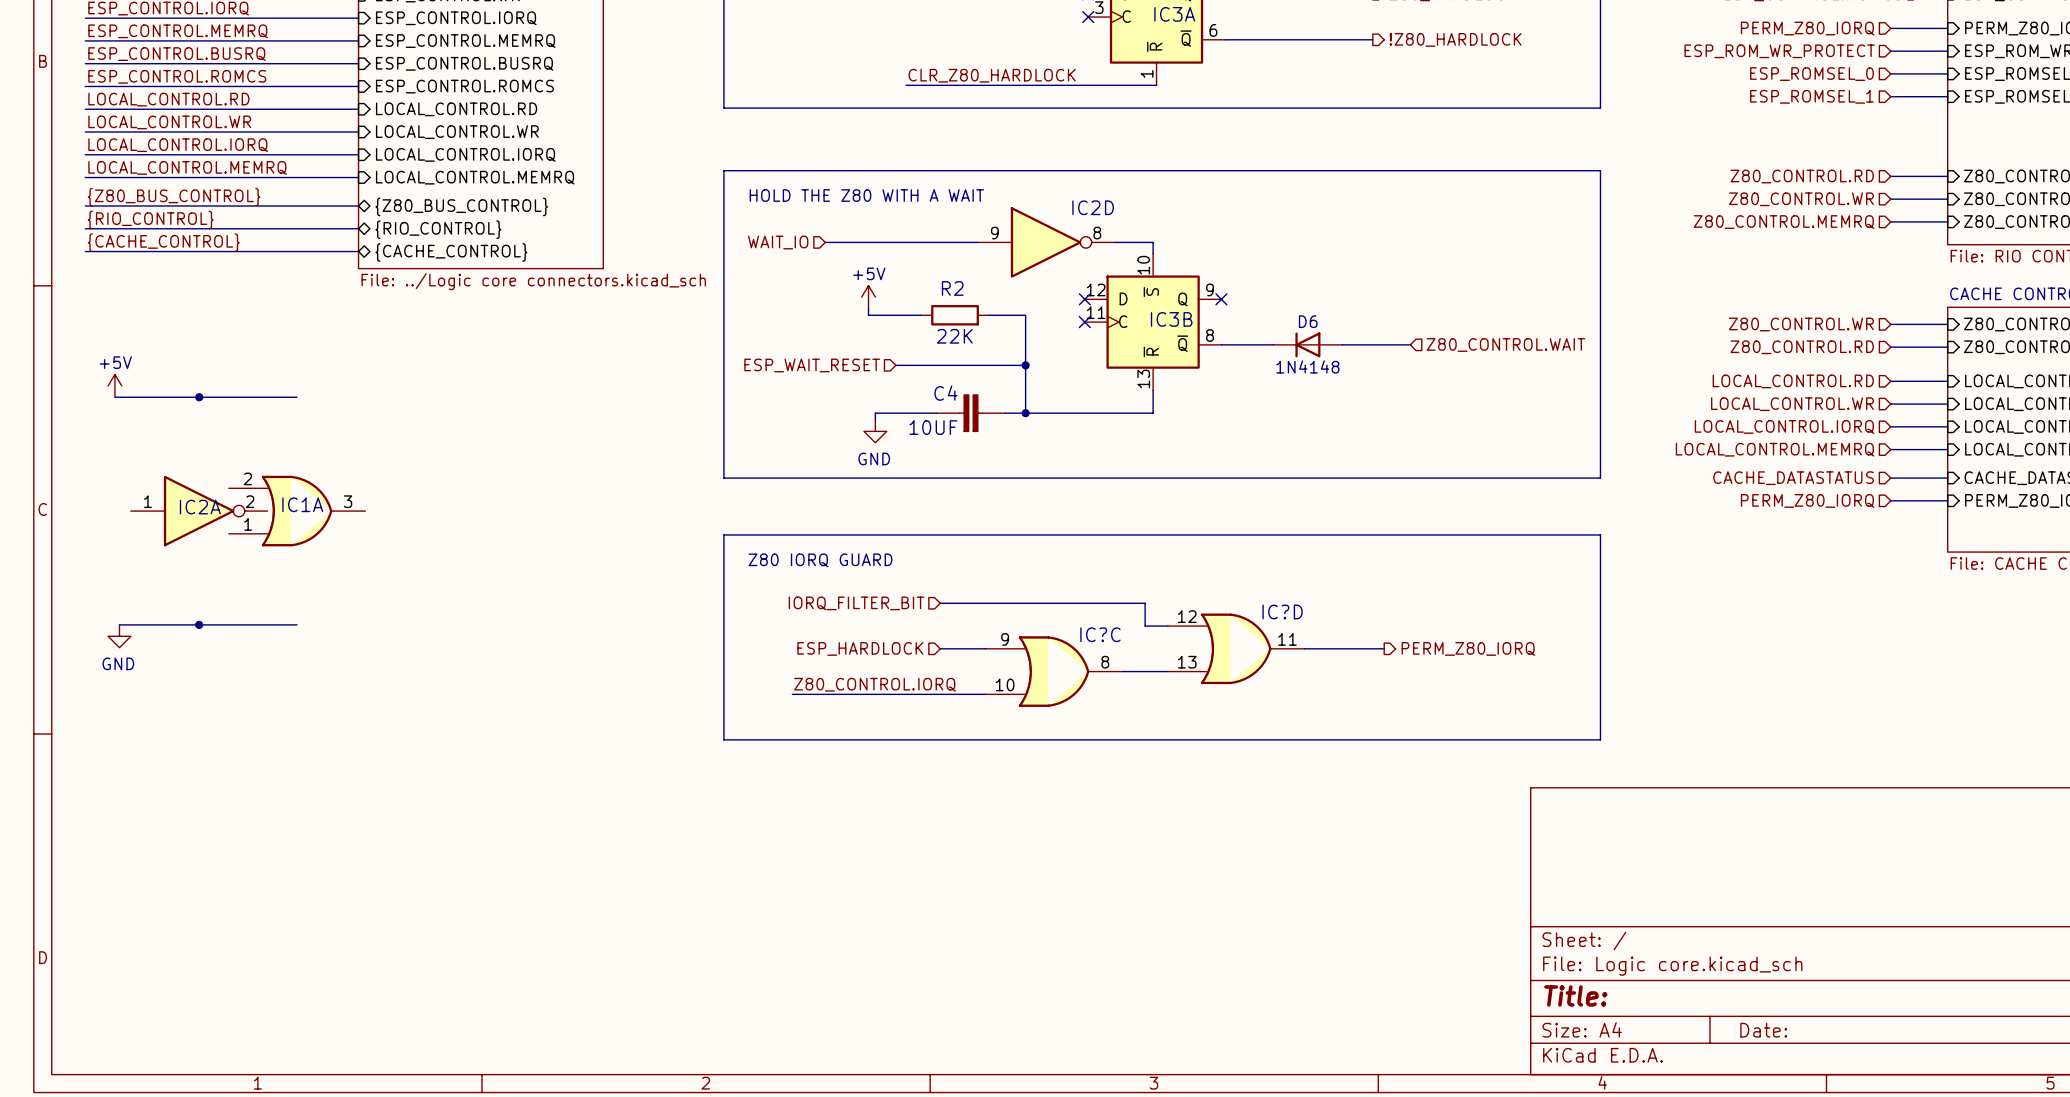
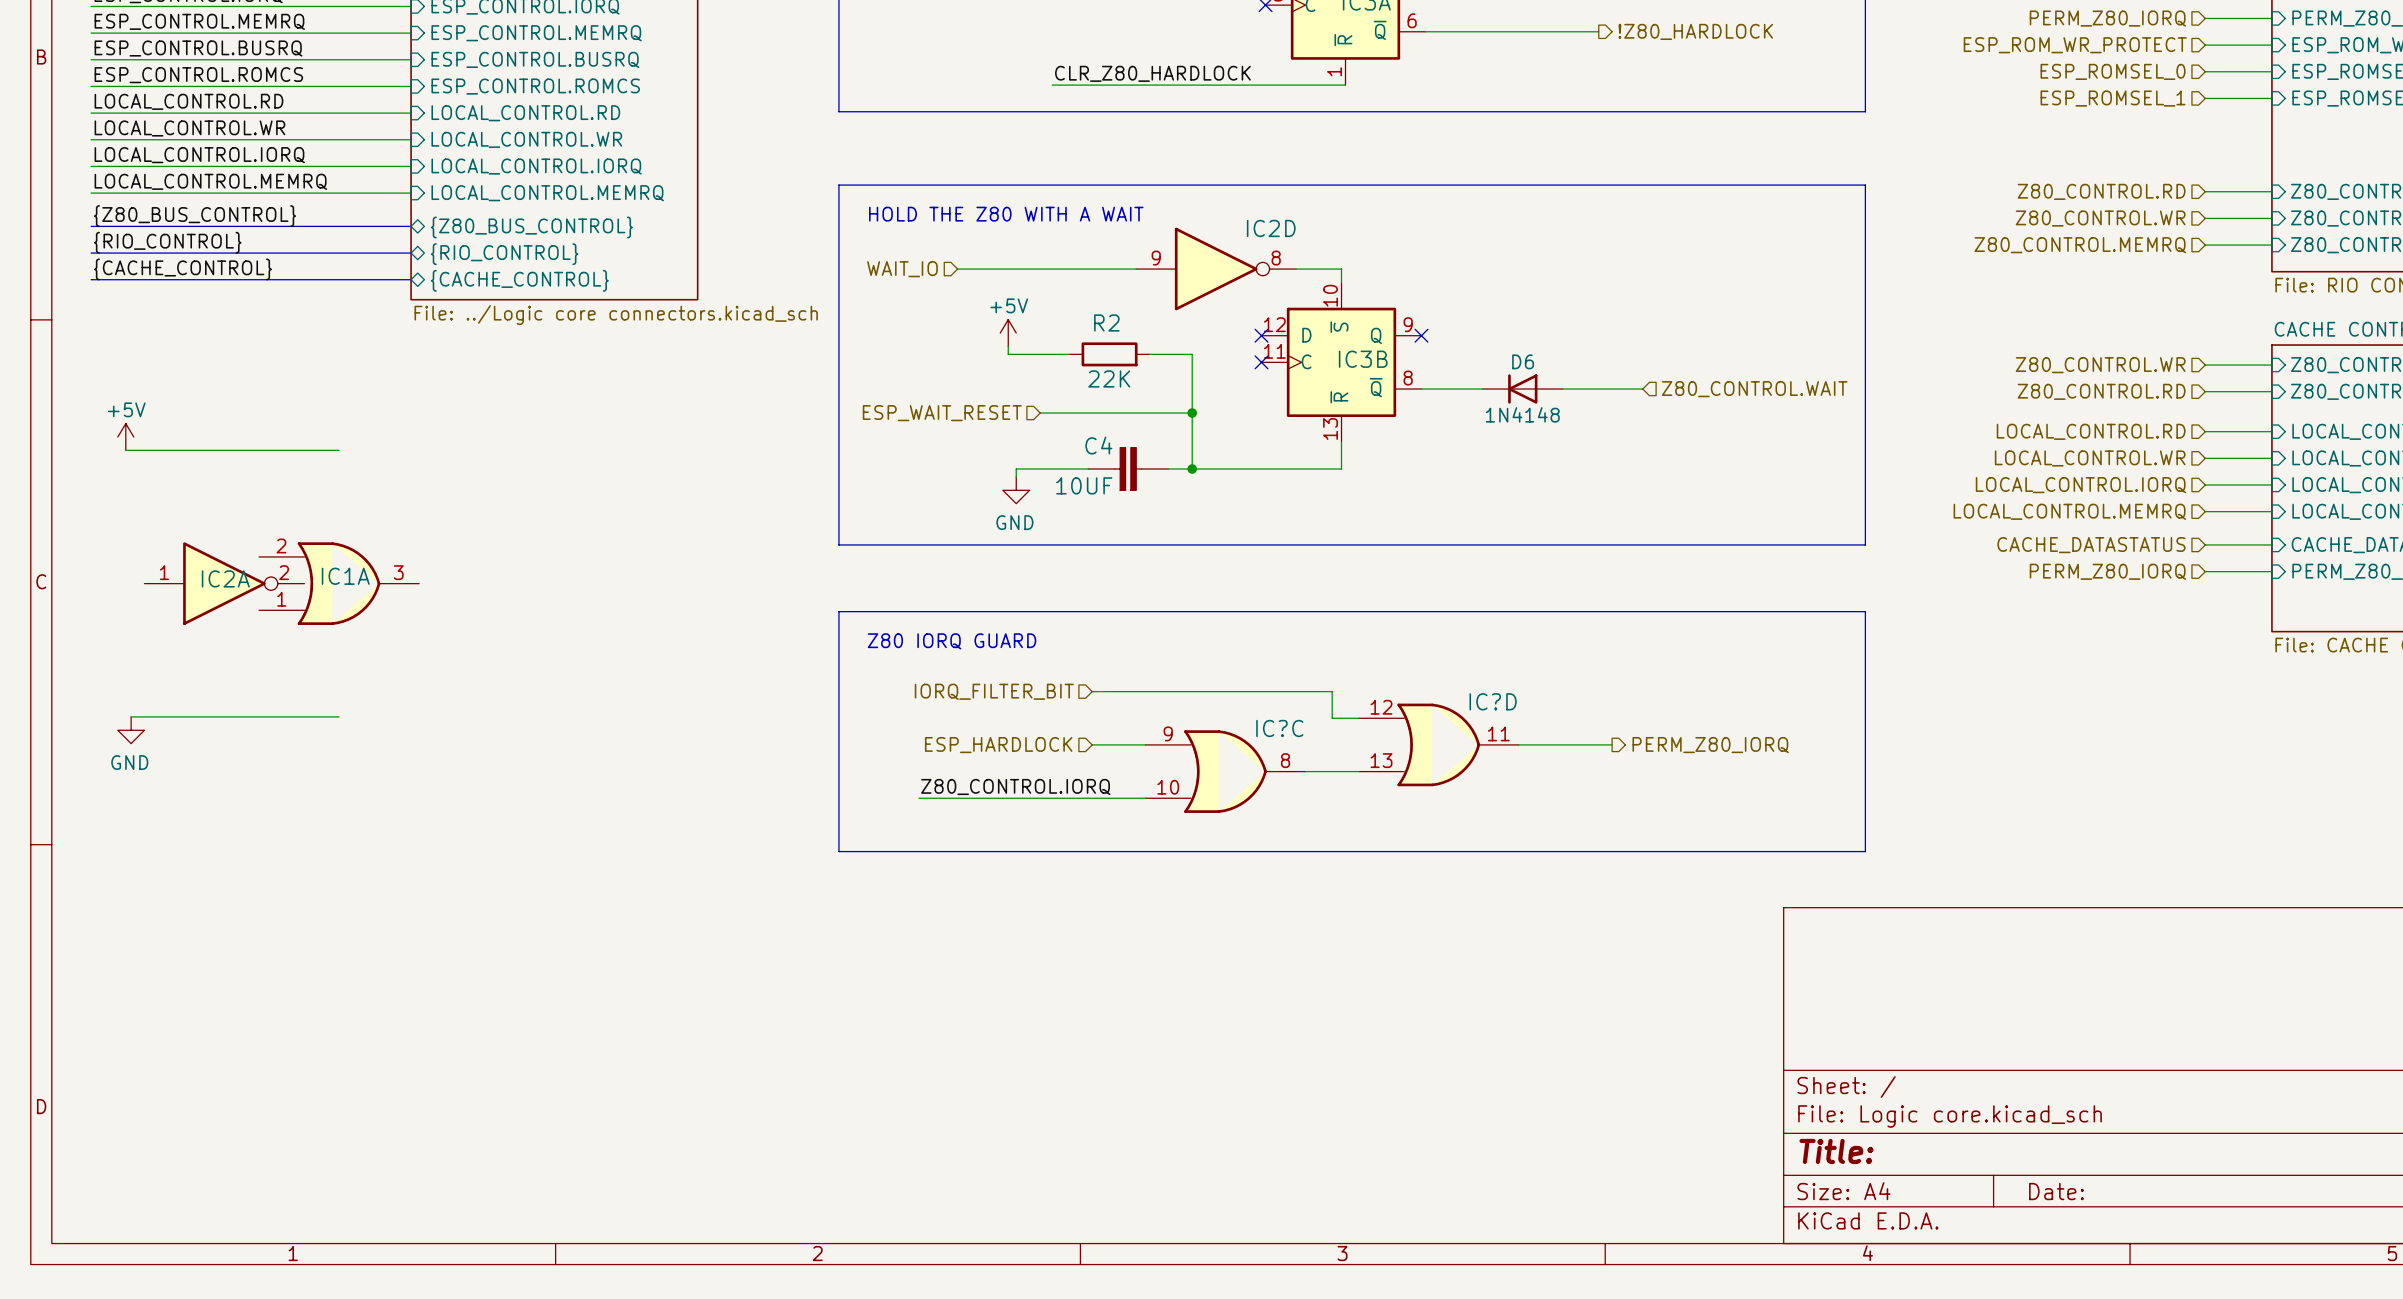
junction: (199, 397) -> none
junction: (199, 624) -> none

